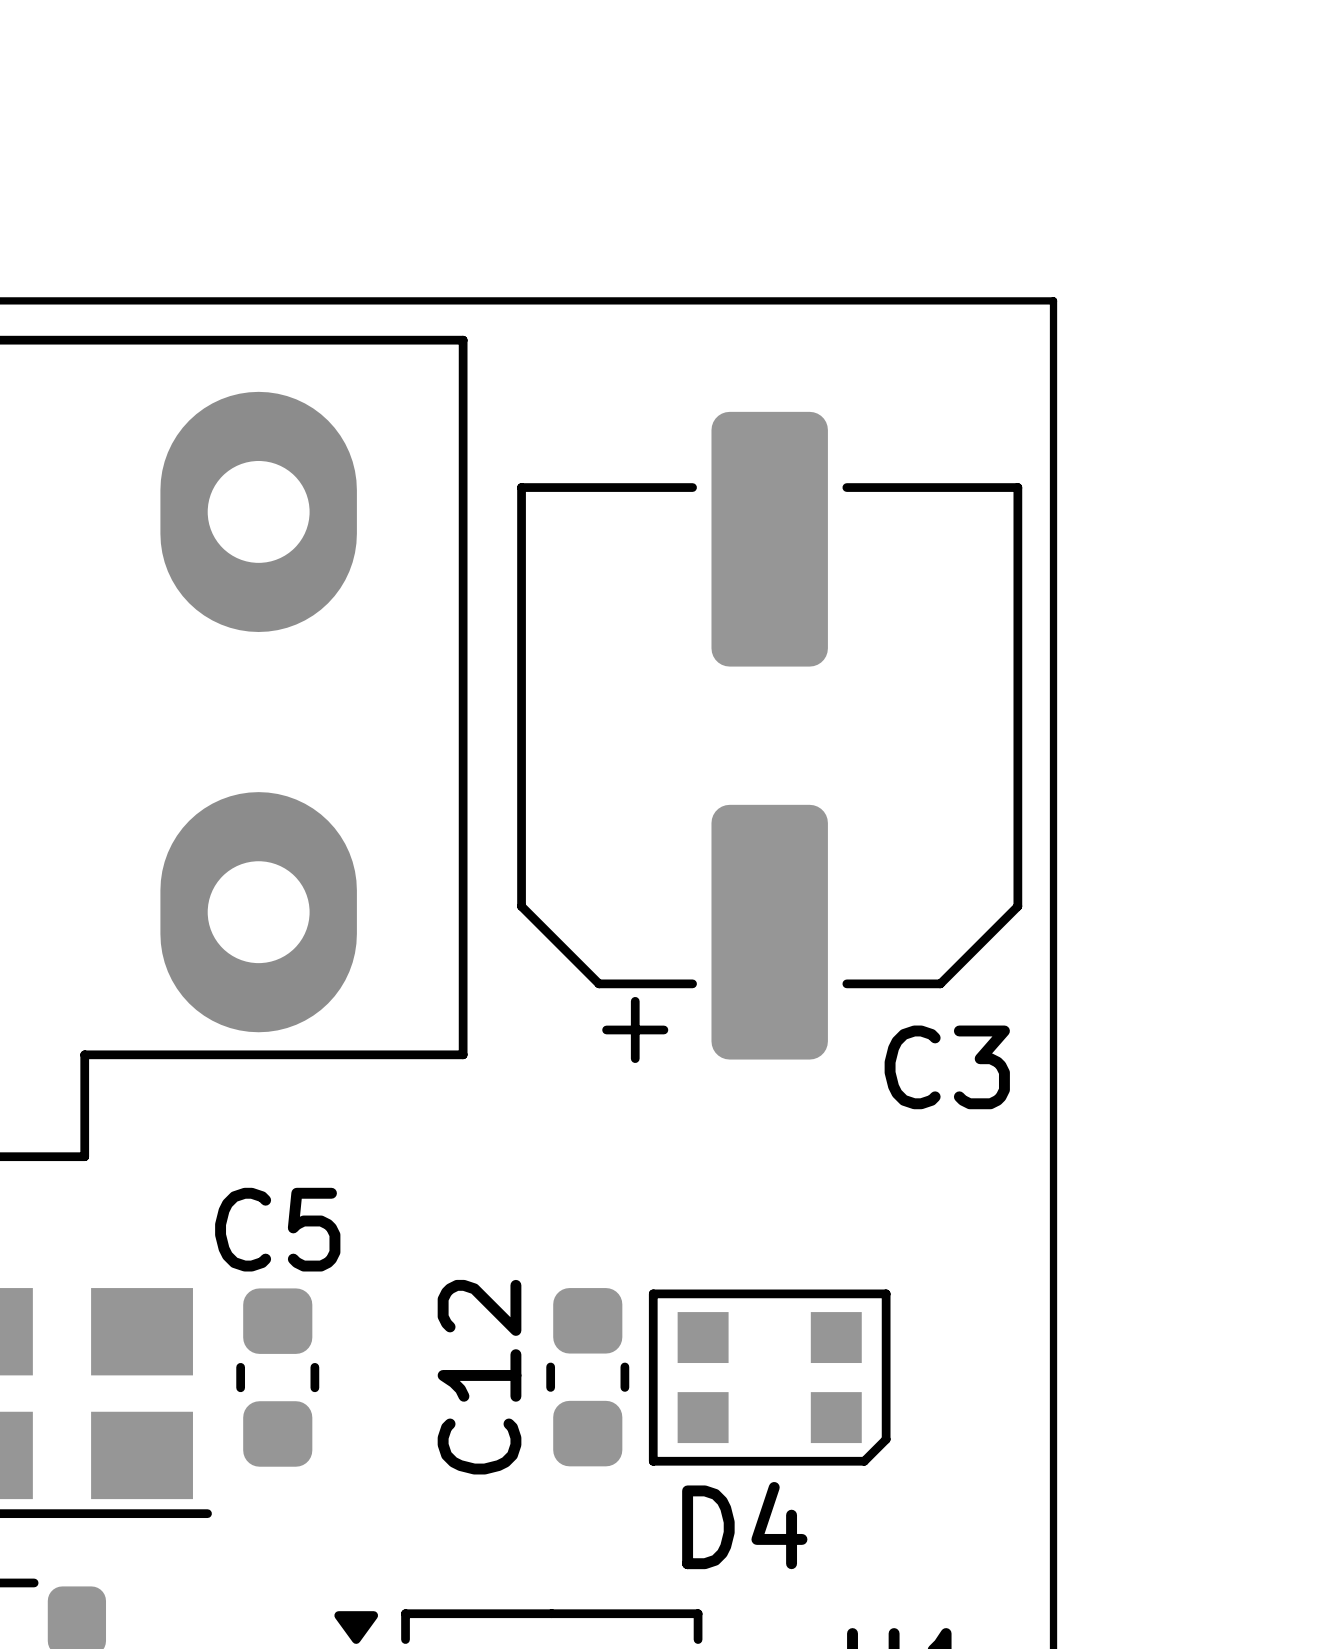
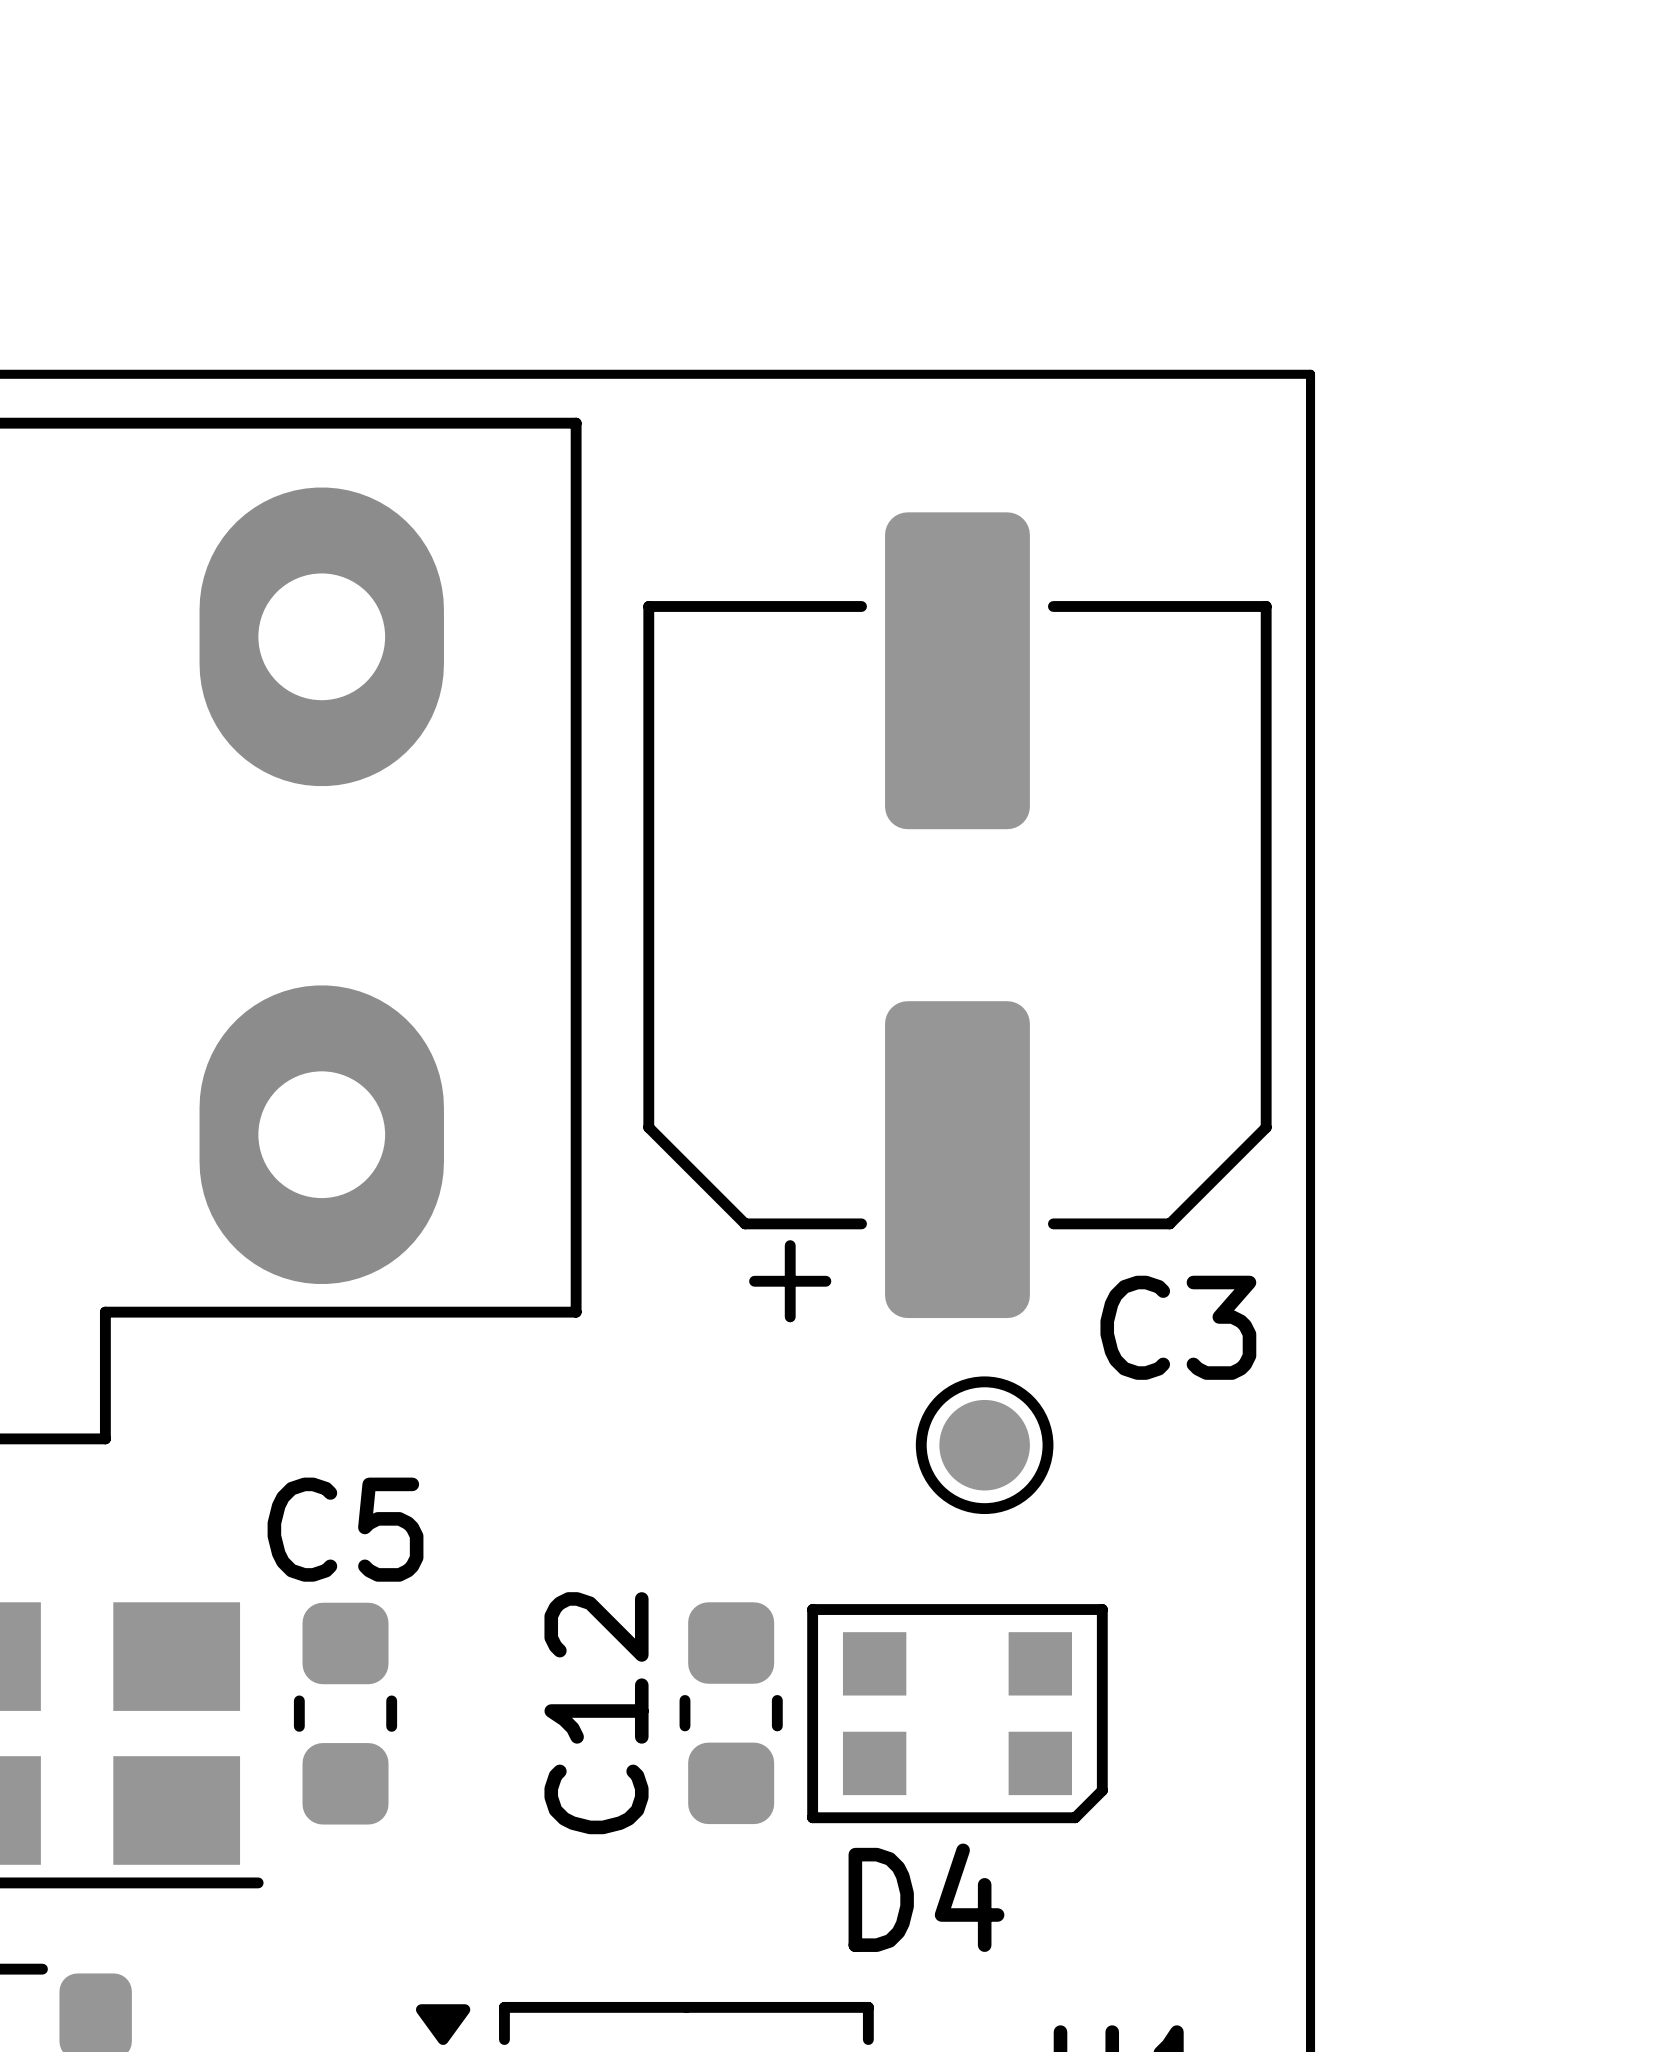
part: none -> (984, 1445)

